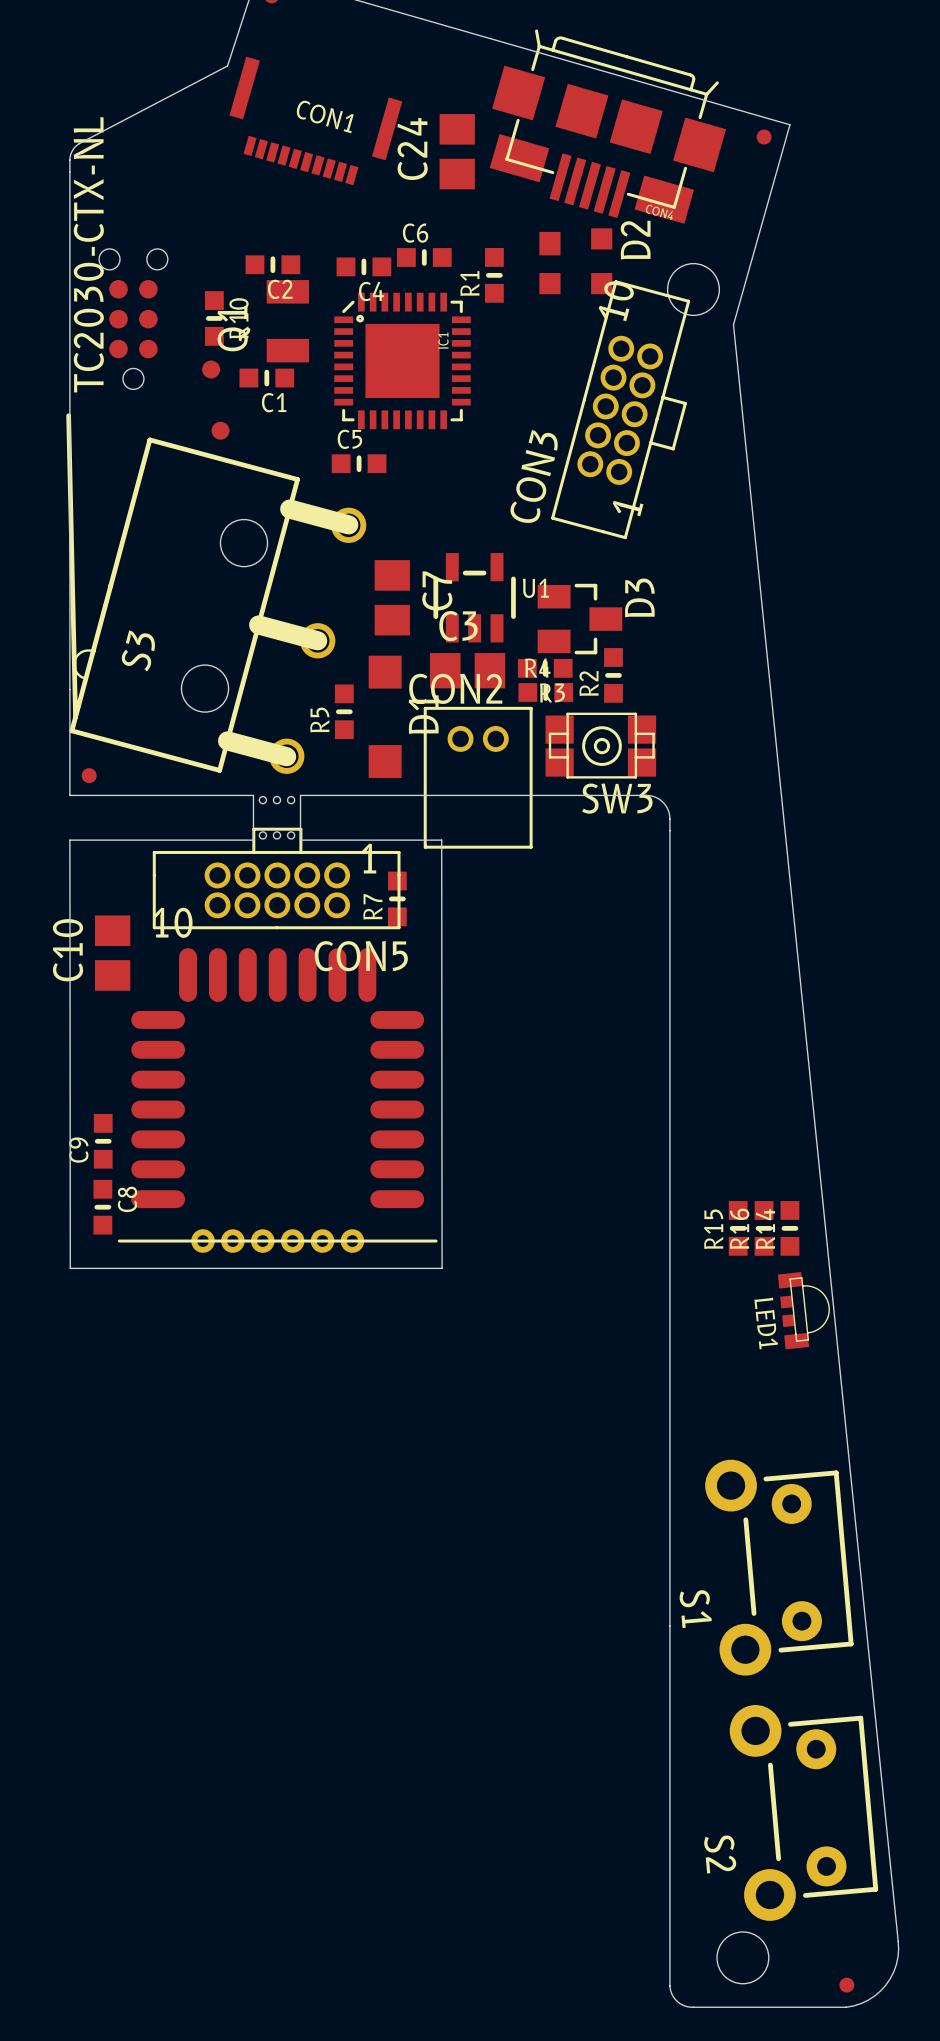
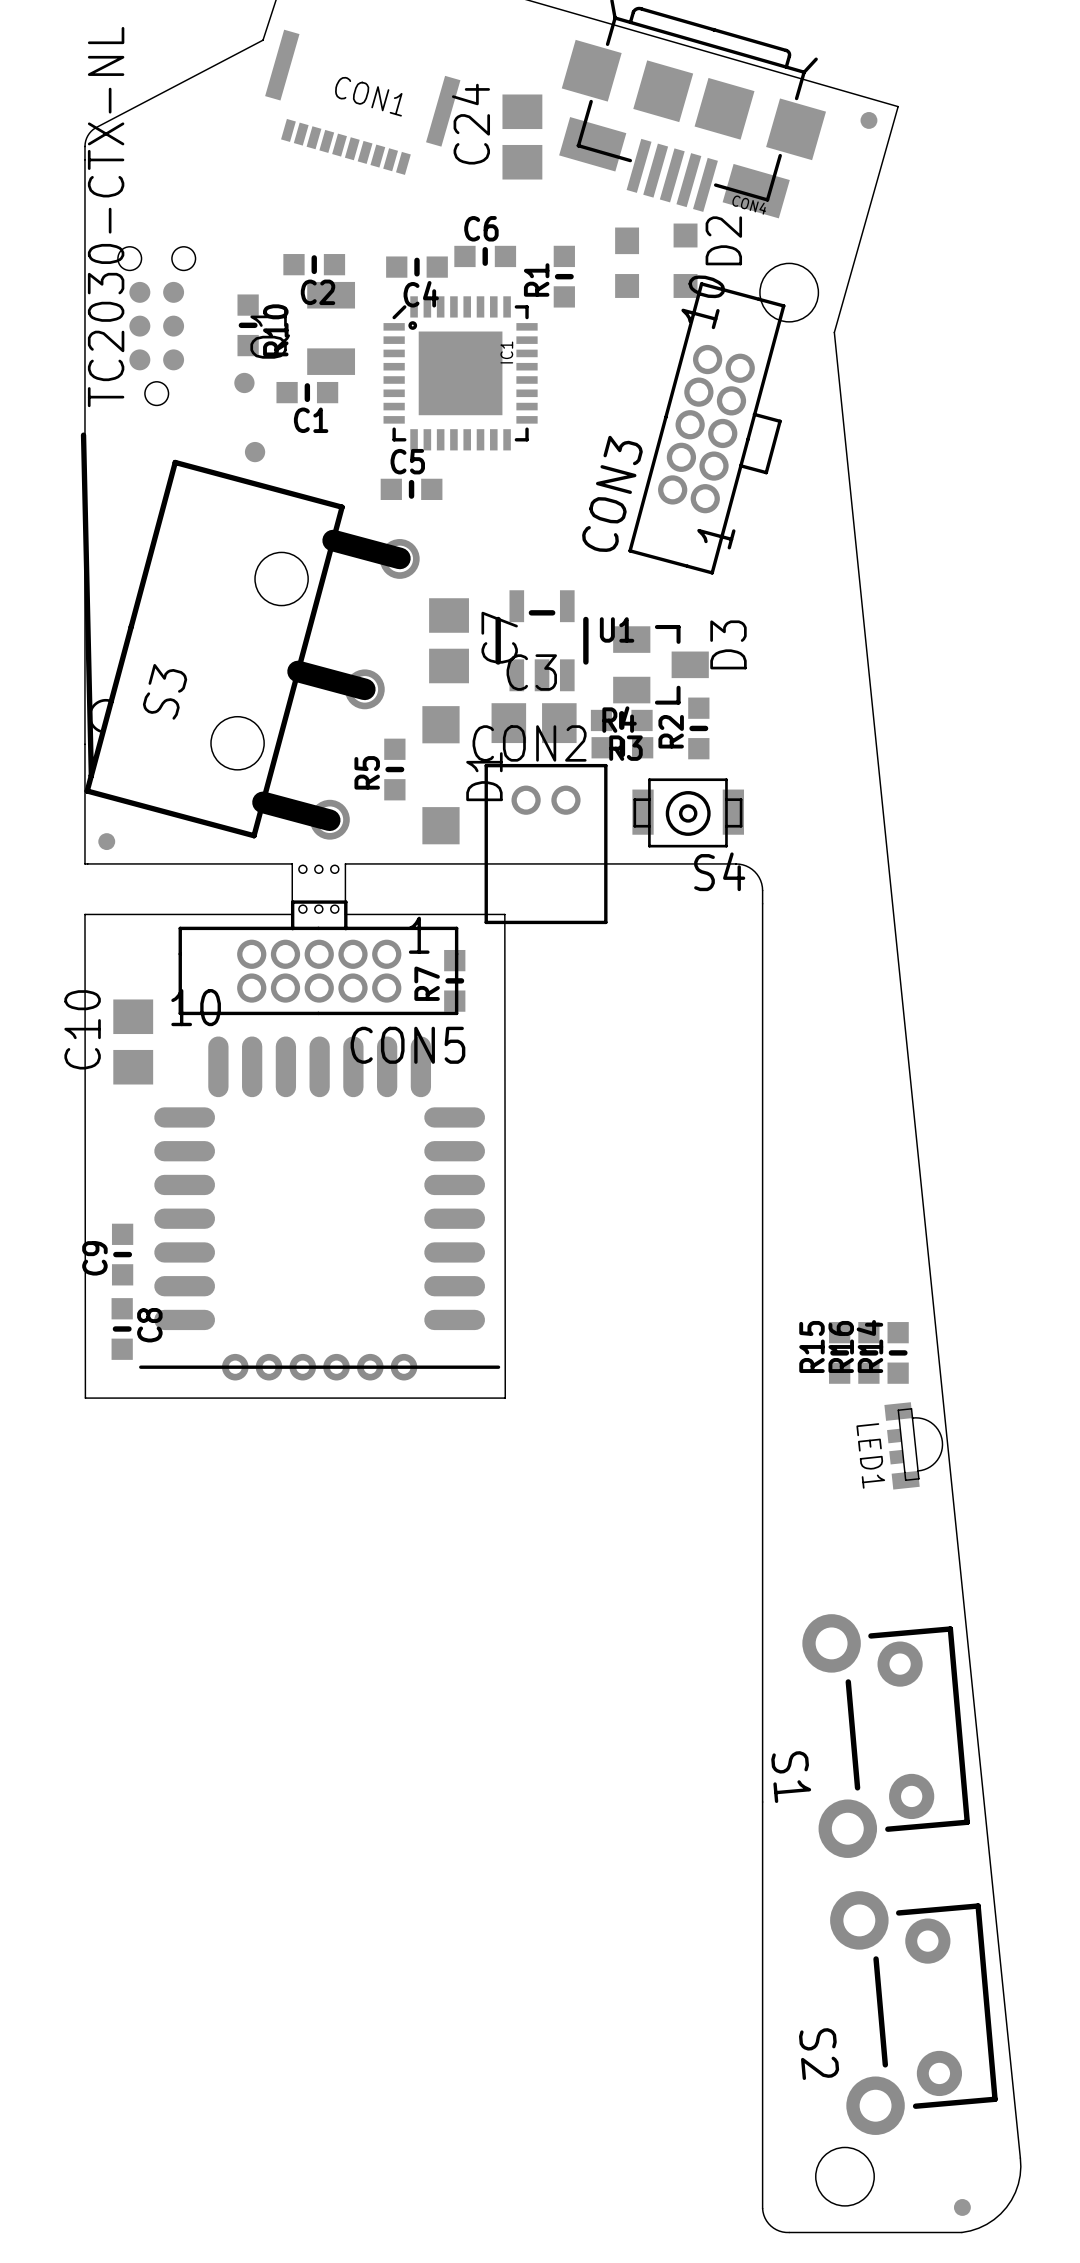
SW3: (600, 745) -> none
S4: none -> (688, 812)

